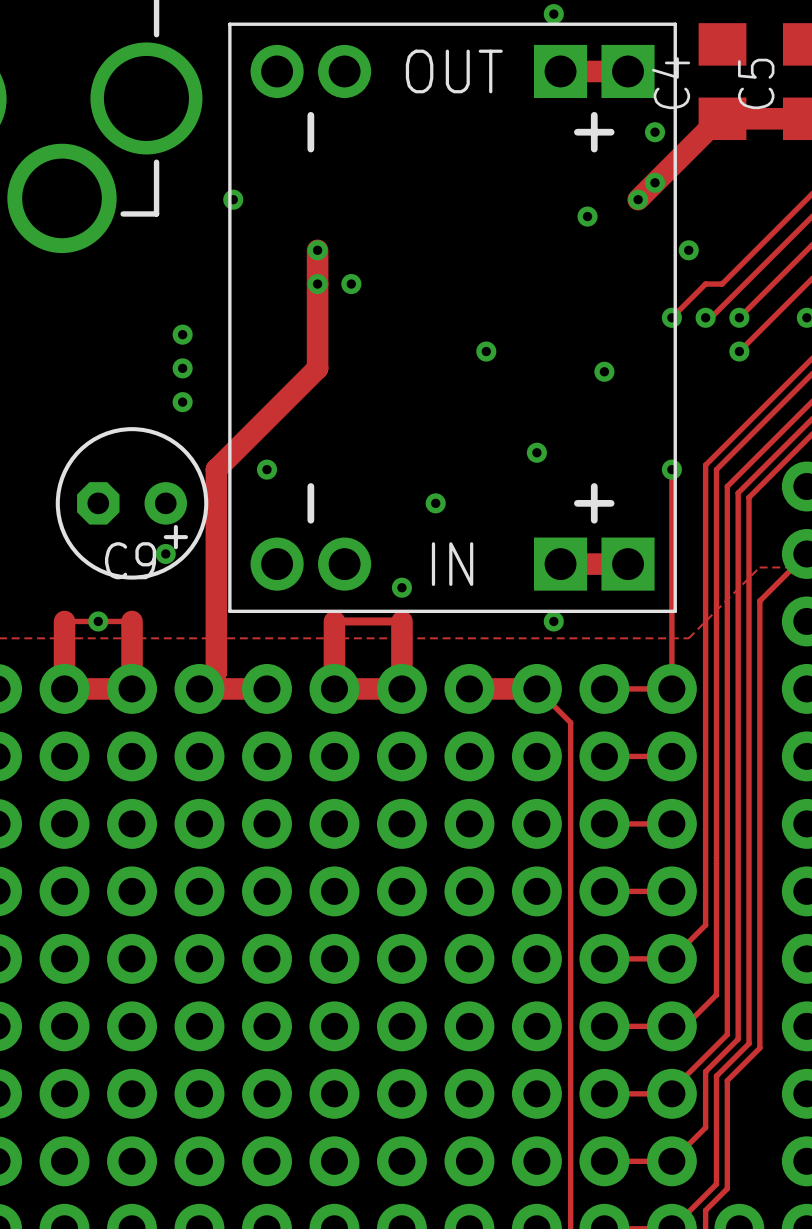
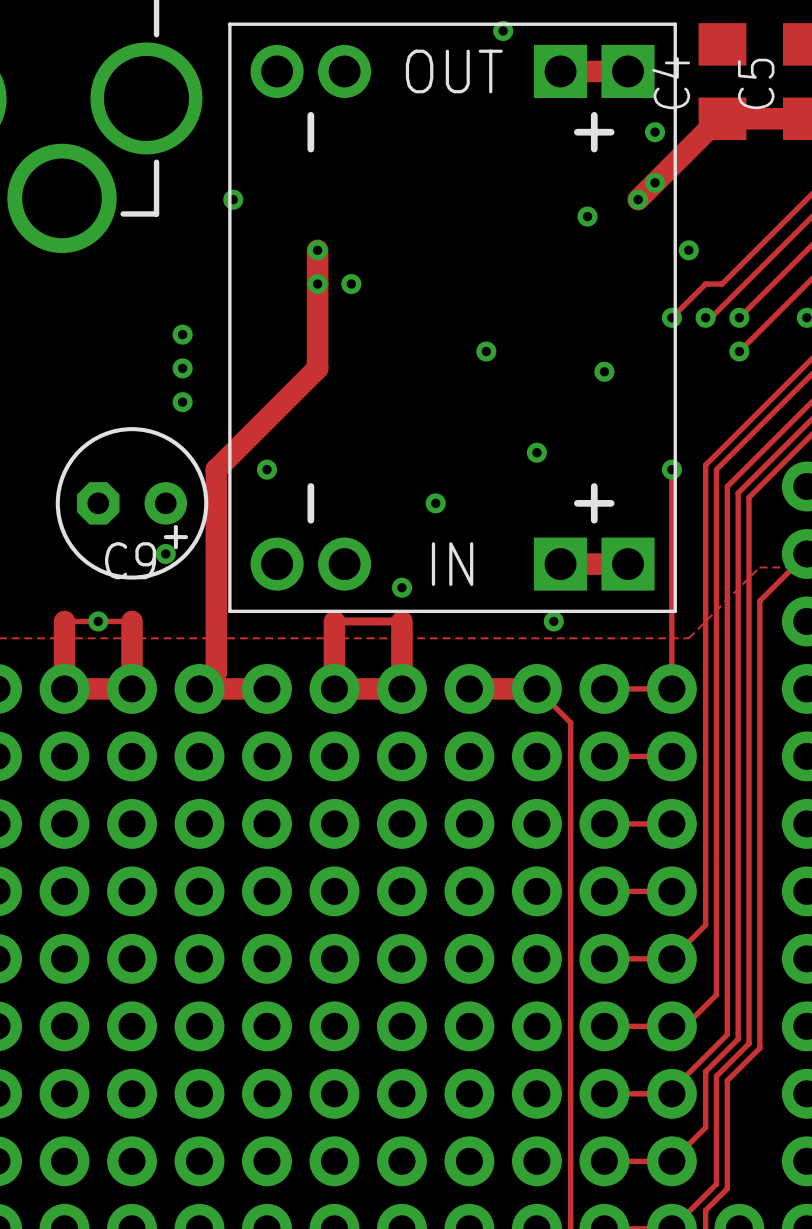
via position: (553, 14) -> (503, 30)

